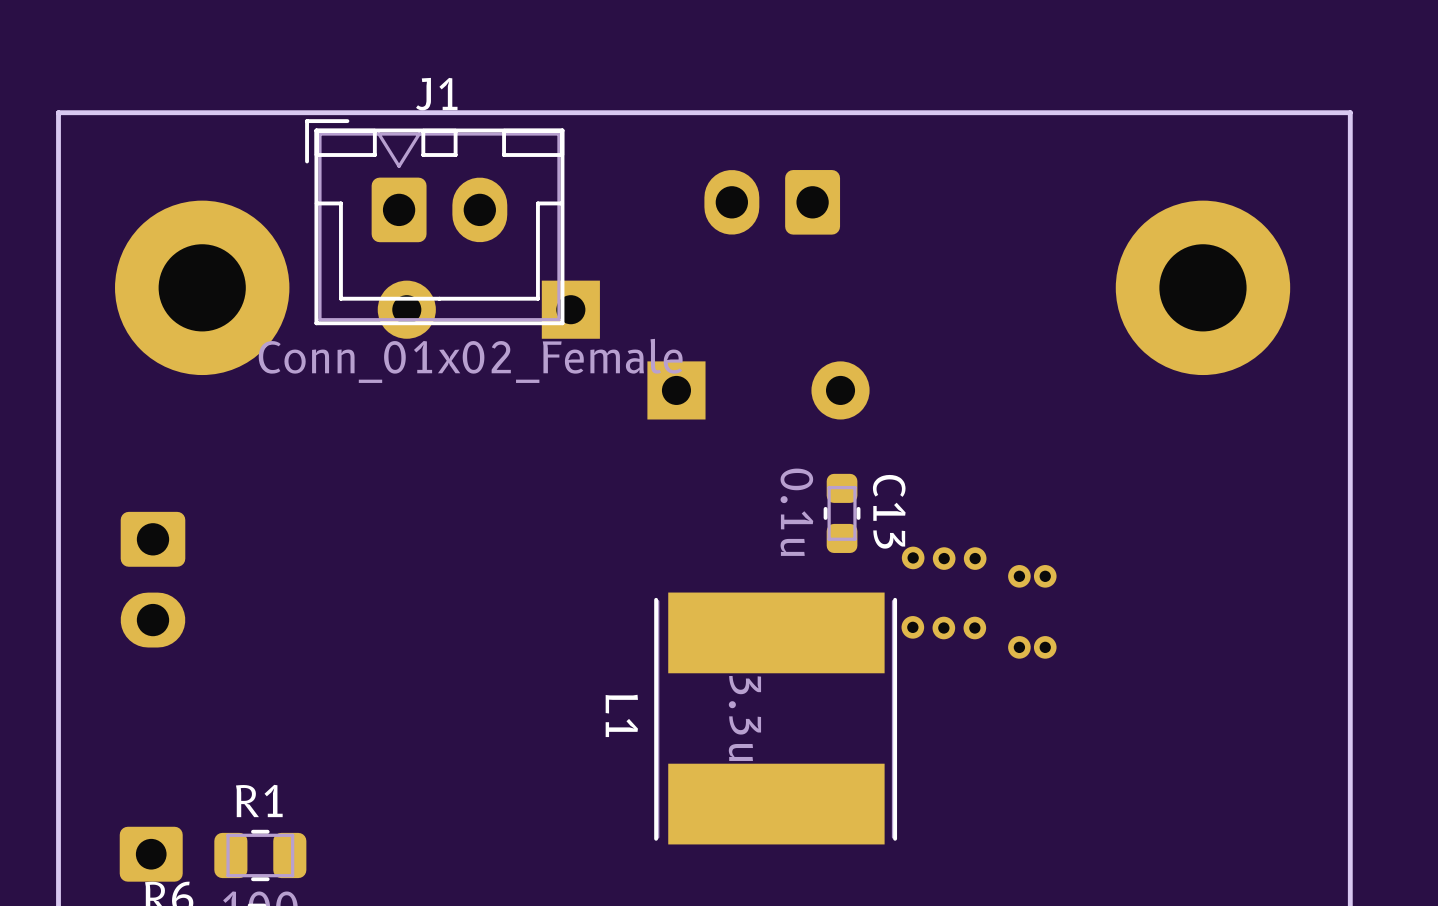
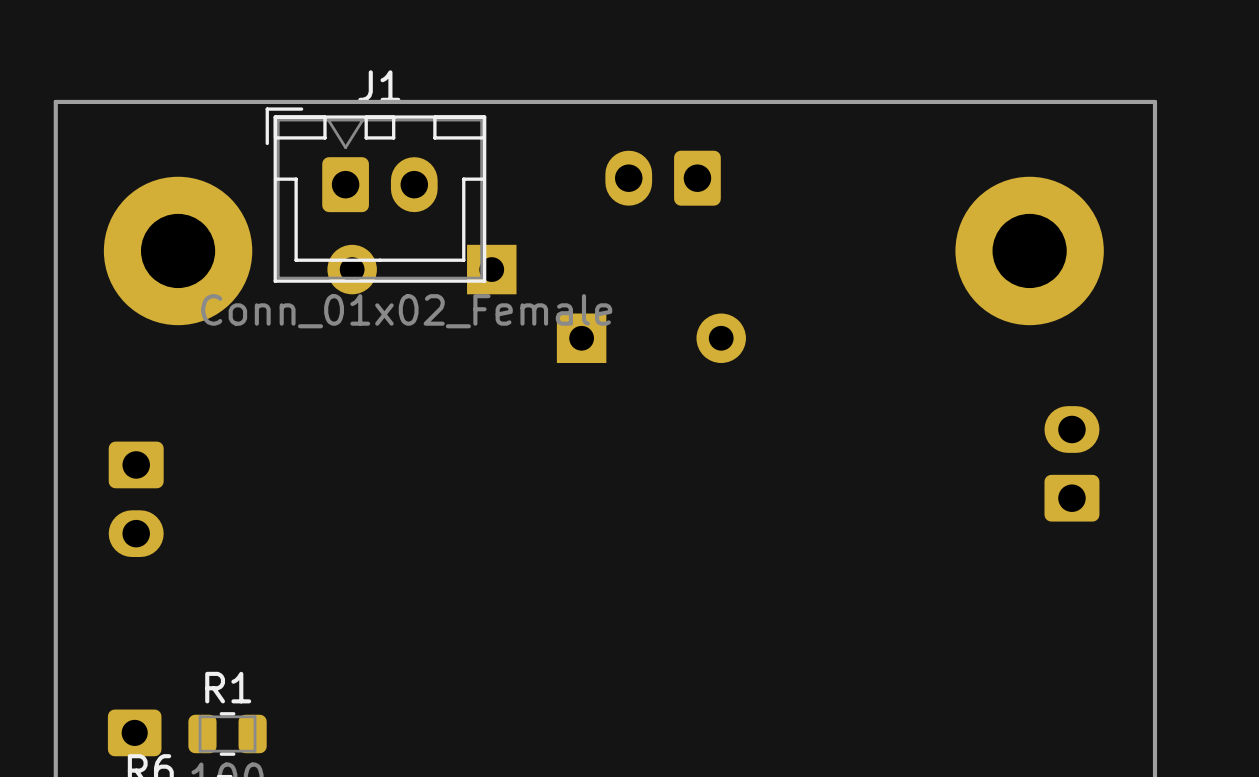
C13: 0.1u (842, 513) -> none
part: none -> (1071, 463)
part: (979, 602) -> none
L1: 3.3u (775, 718) -> none

